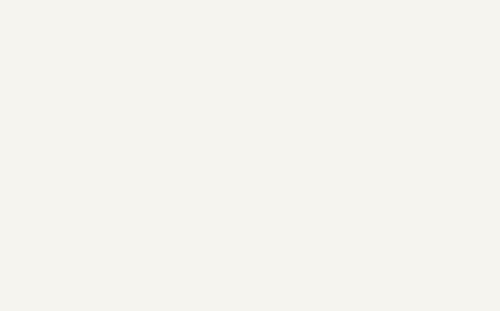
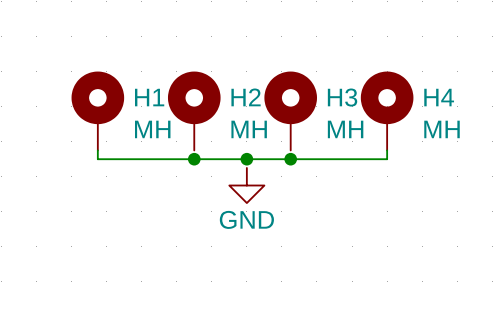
H1: none -> MH (97, 110)
H2: none -> MH (194, 110)
H3: none -> MH (290, 110)
H4: none -> MH (387, 110)
wire: none -> (97, 150) (97, 159) (387, 159) (387, 150)
junction: none -> (194, 159)
junction: none -> (246, 159)
junction: none -> (290, 159)
power symbol: none -> GND (246, 185)

